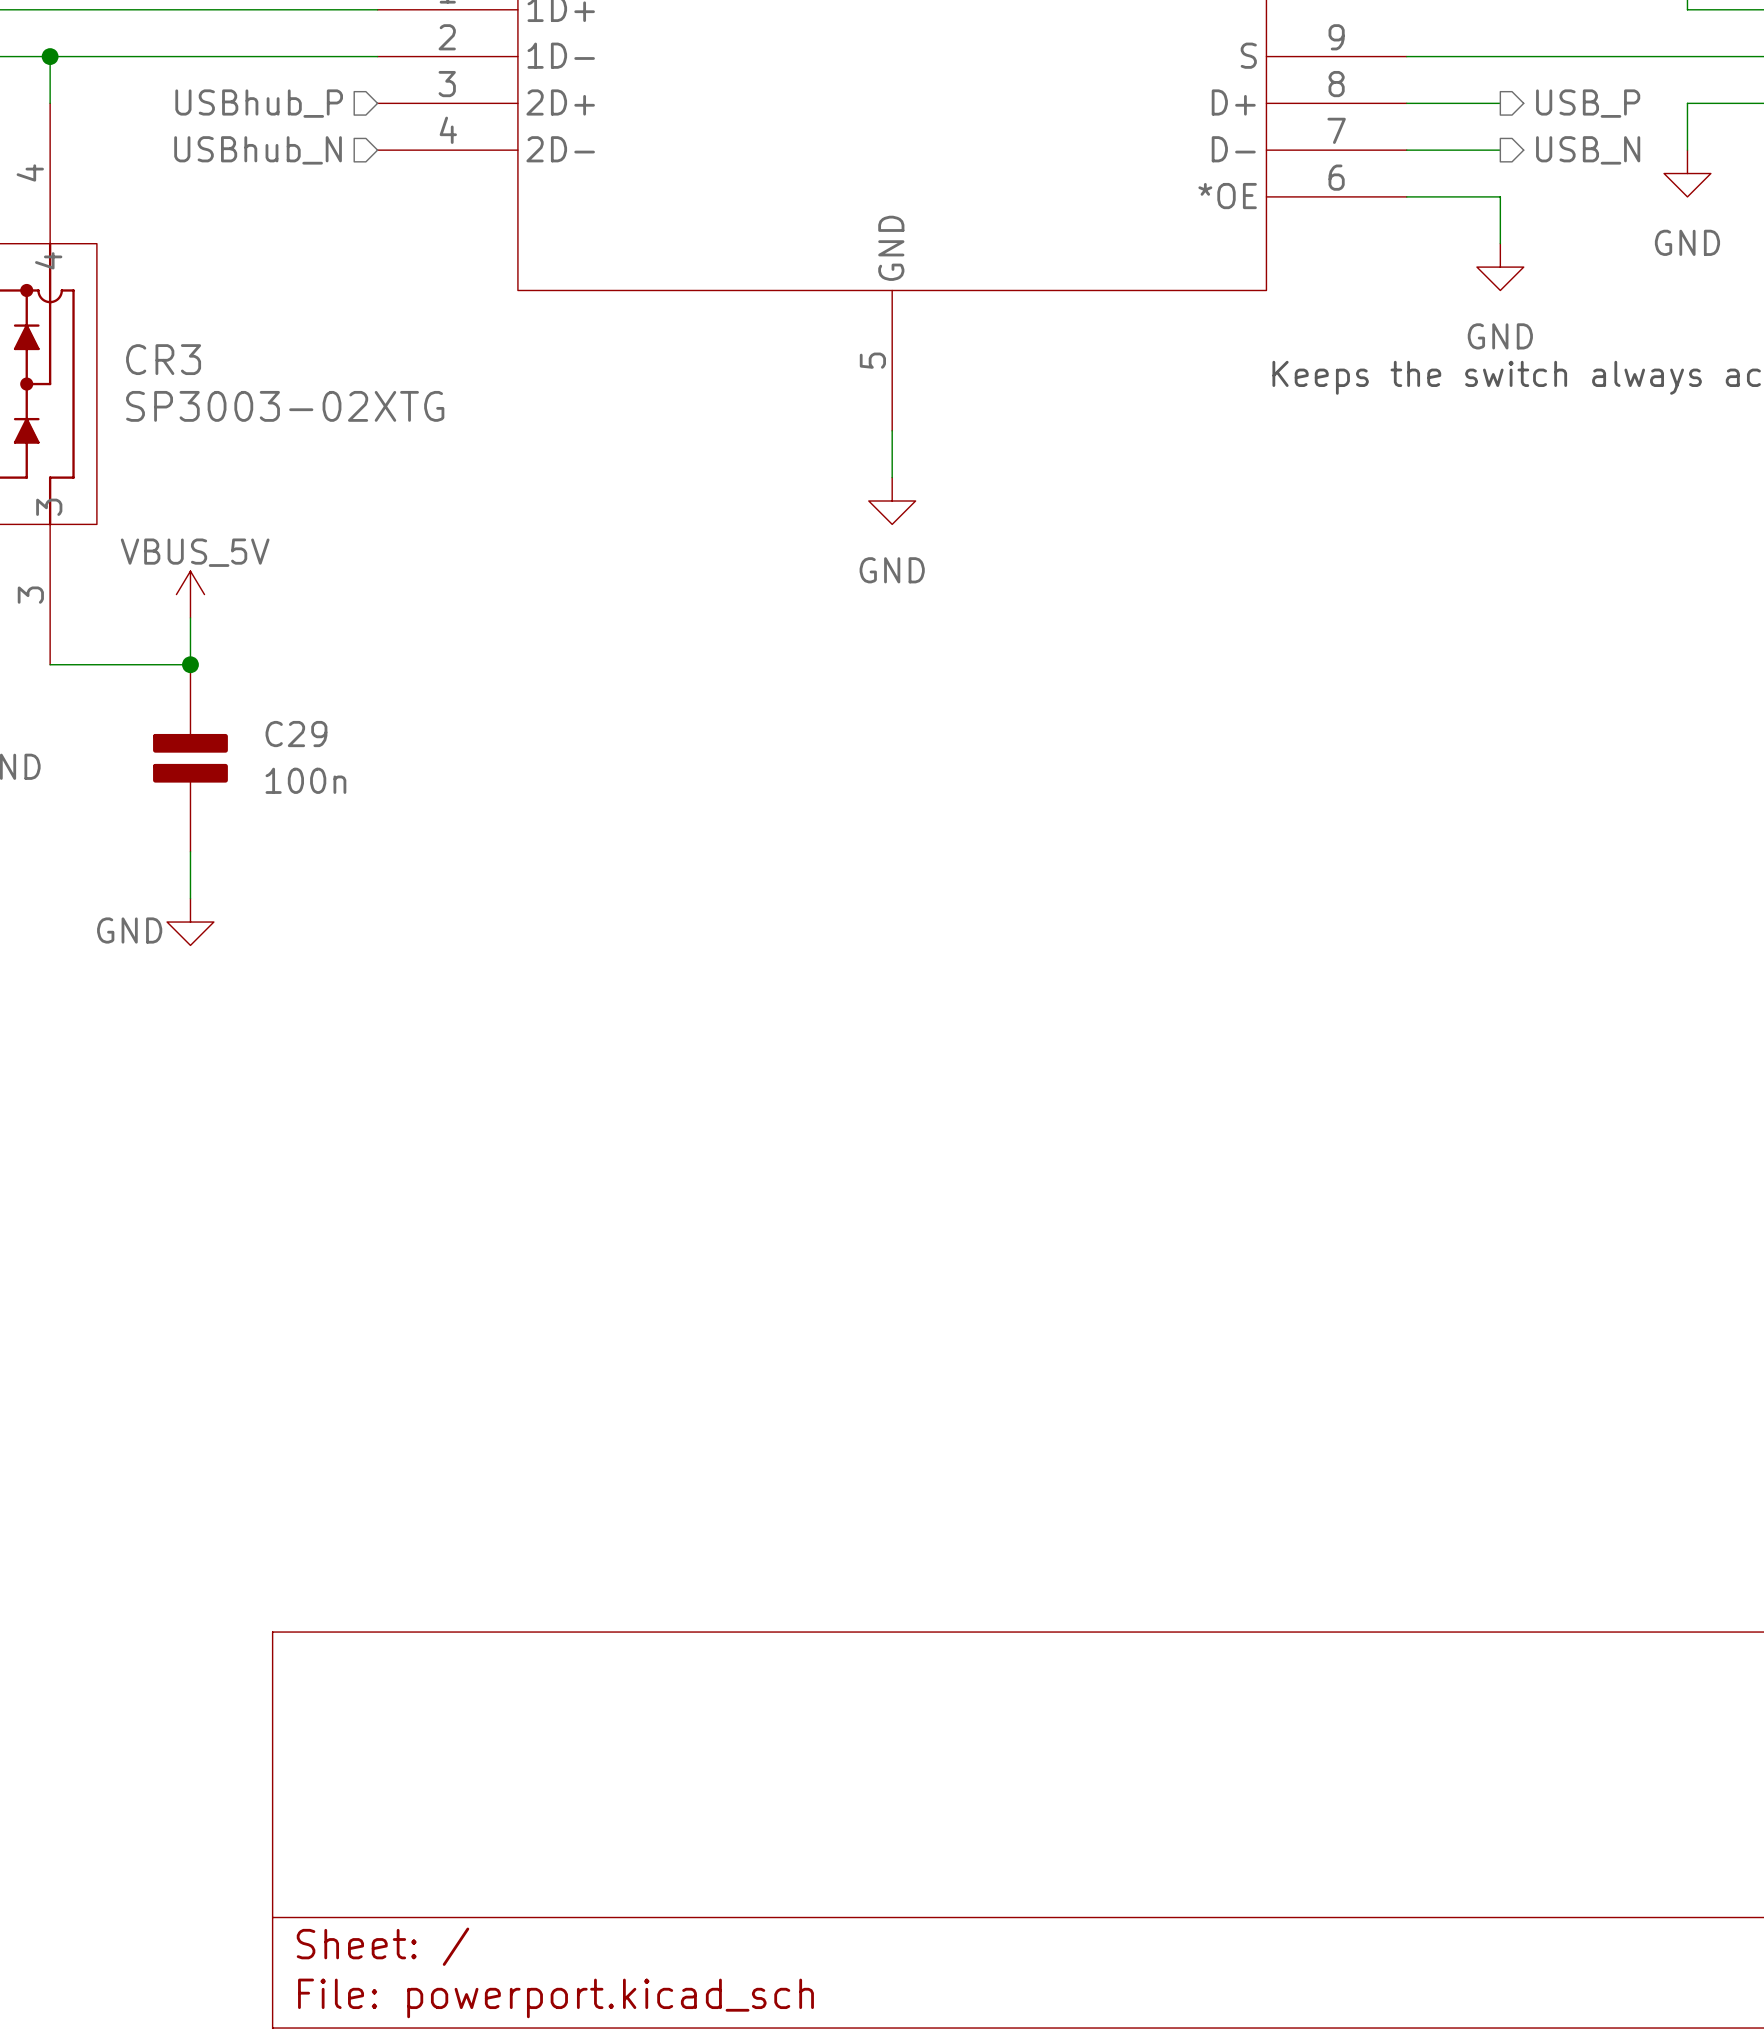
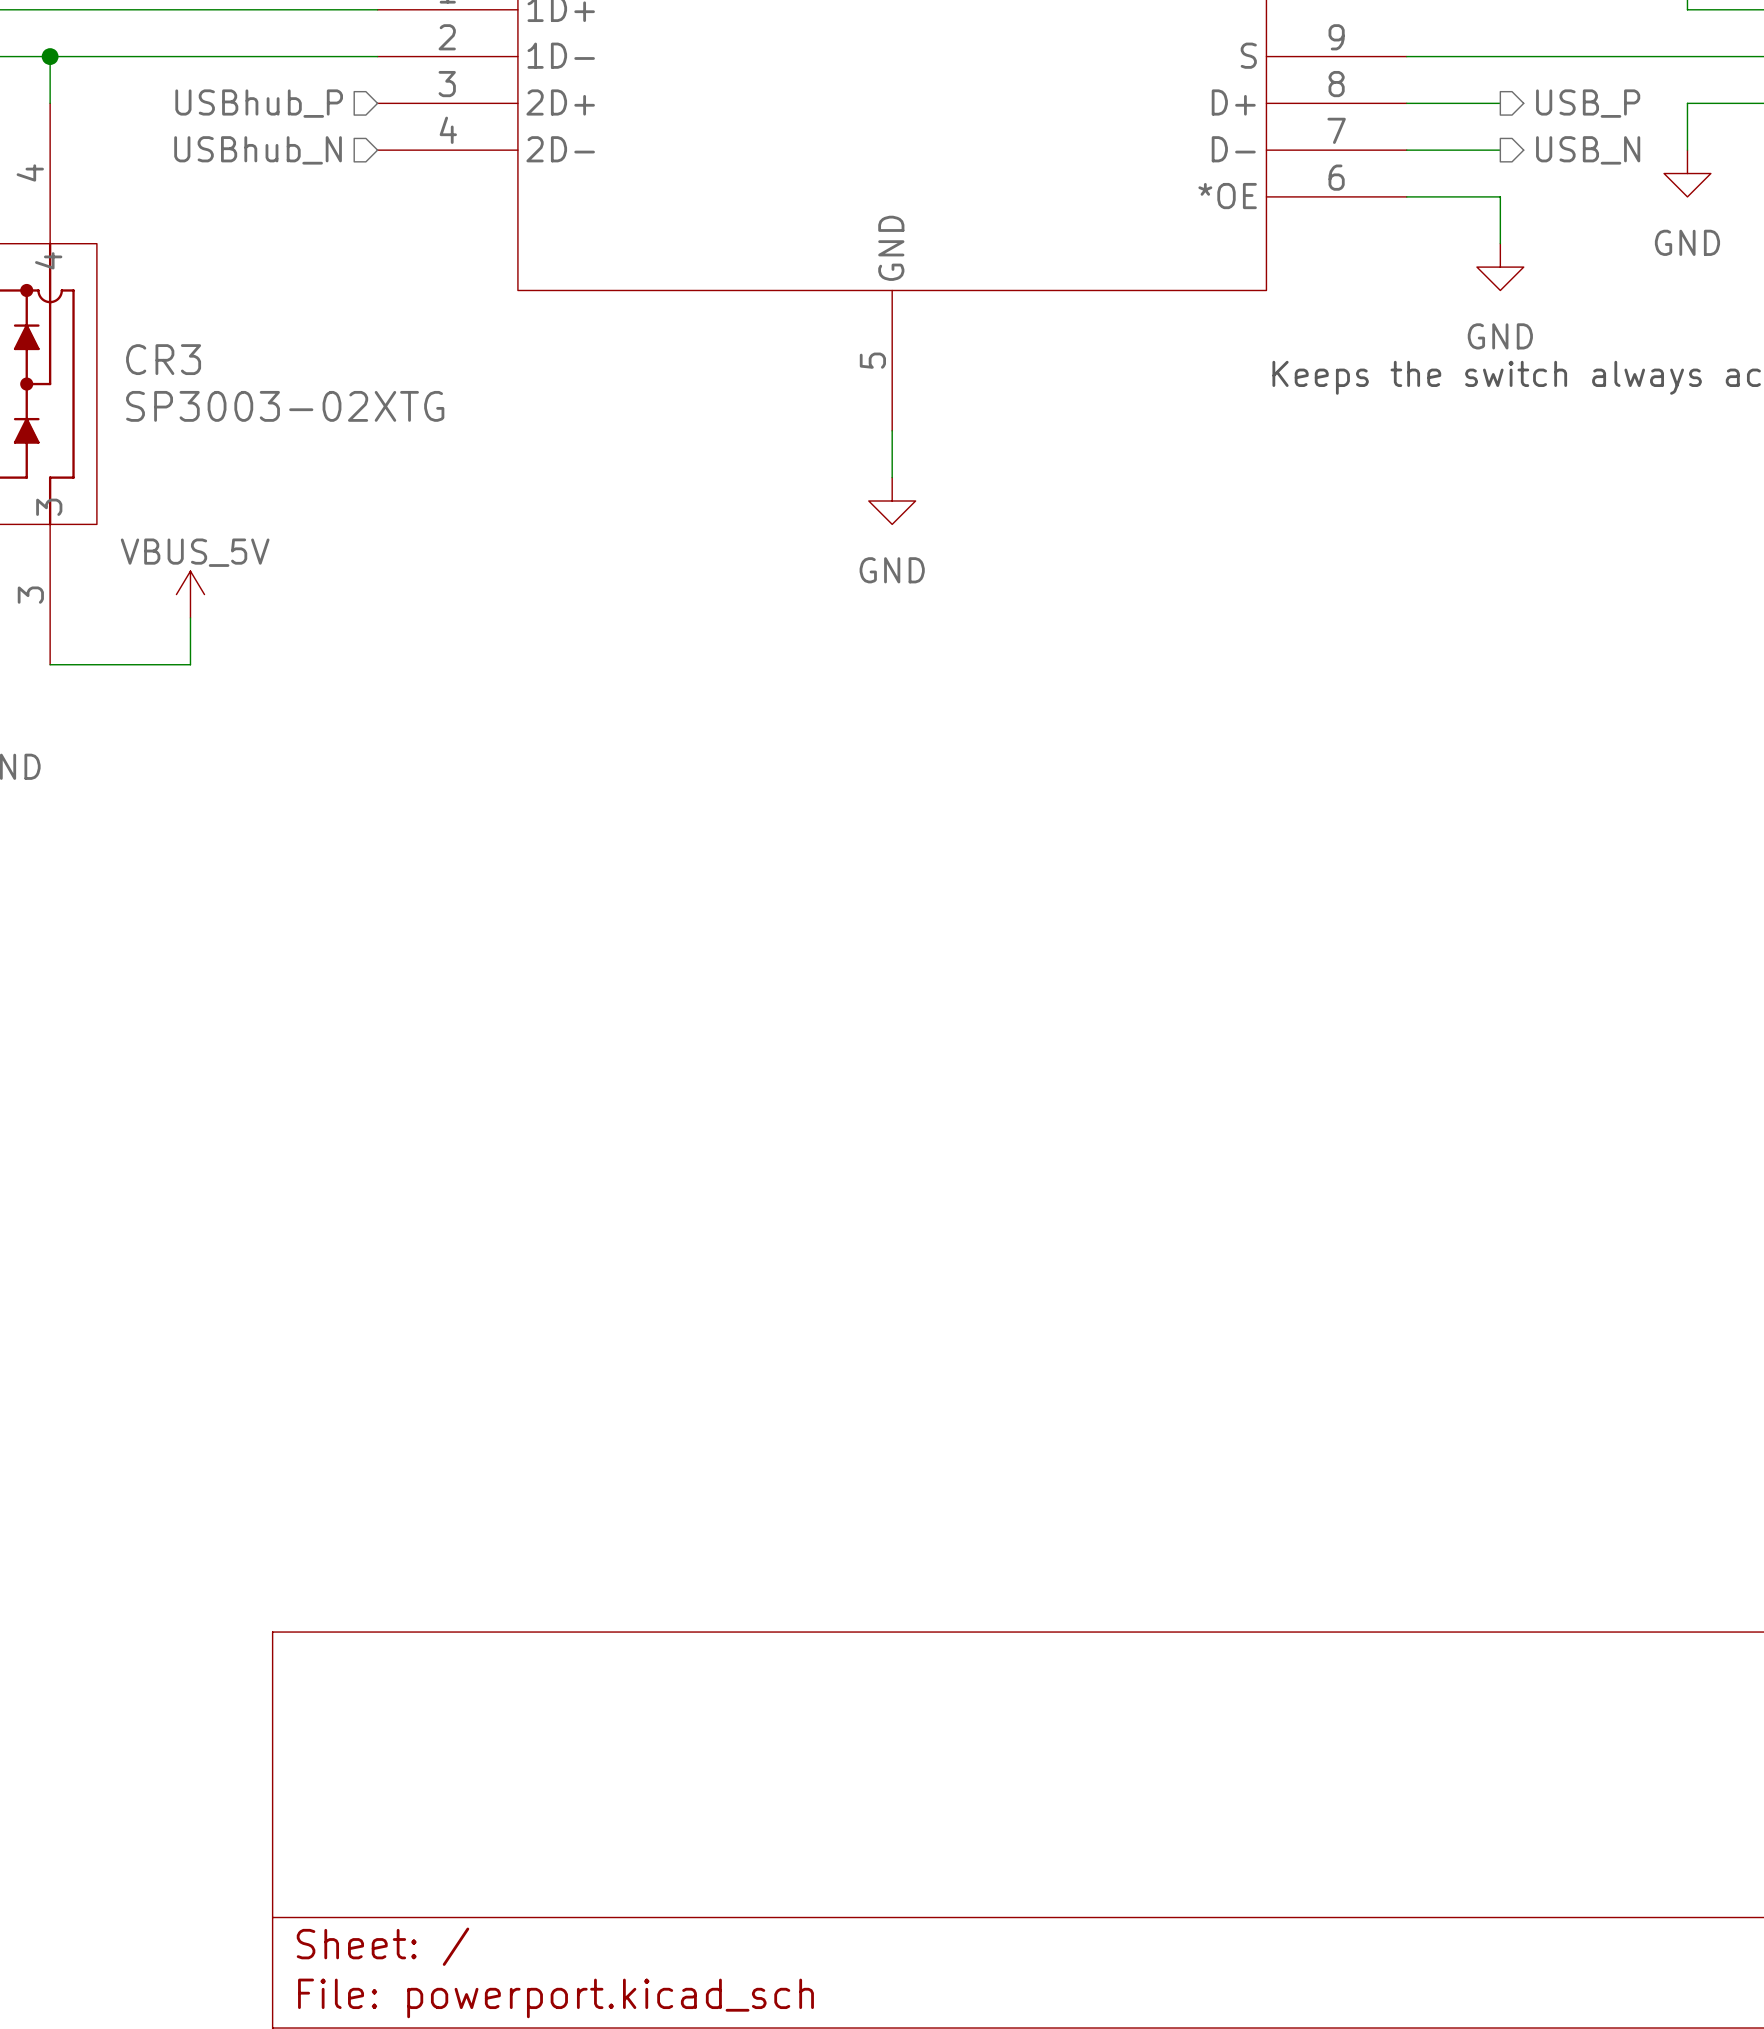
junction: (190, 664) -> none
C29: 100n (190, 758) -> none
wire: (190, 851) (190, 898) -> none
power symbol: GND (190, 922) -> none

